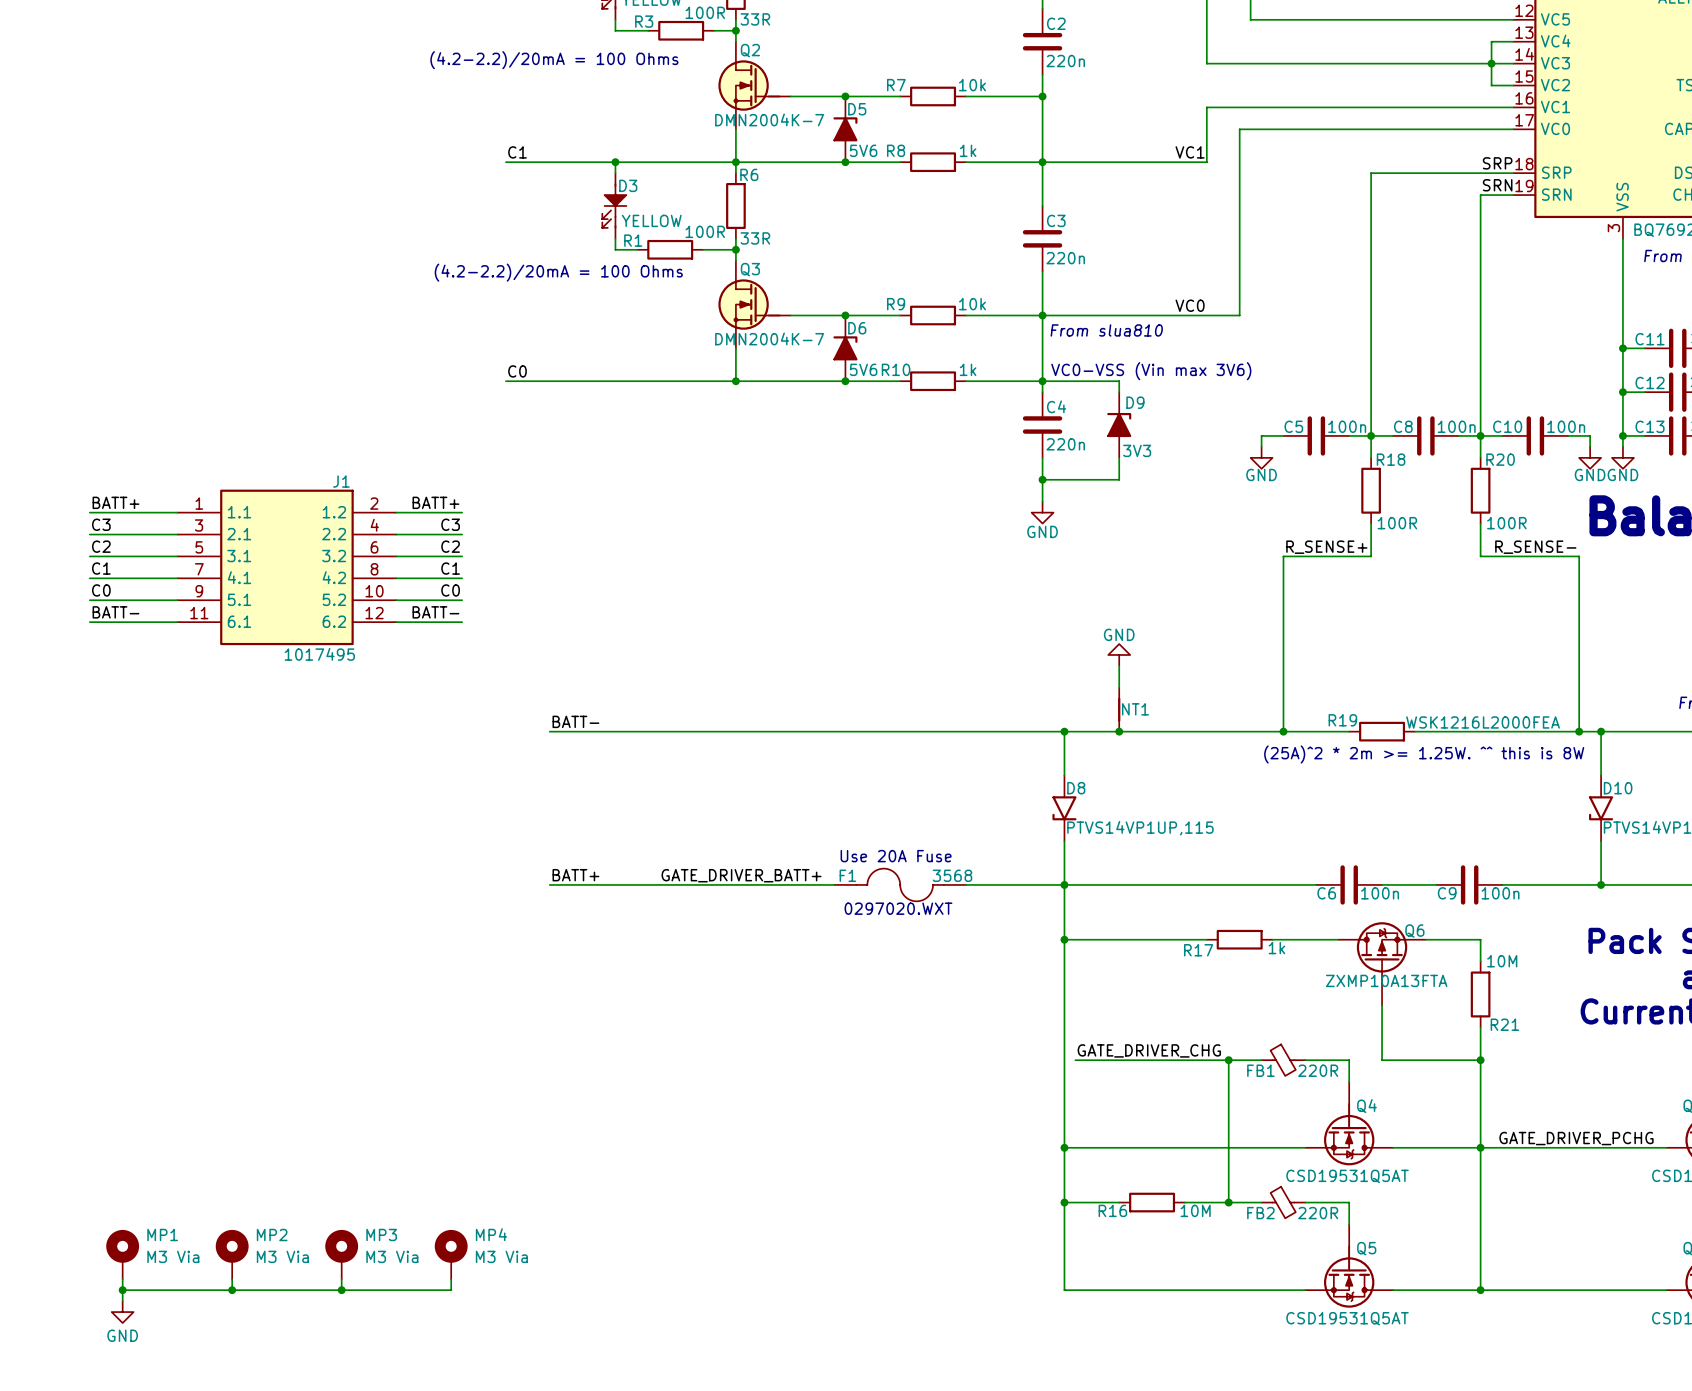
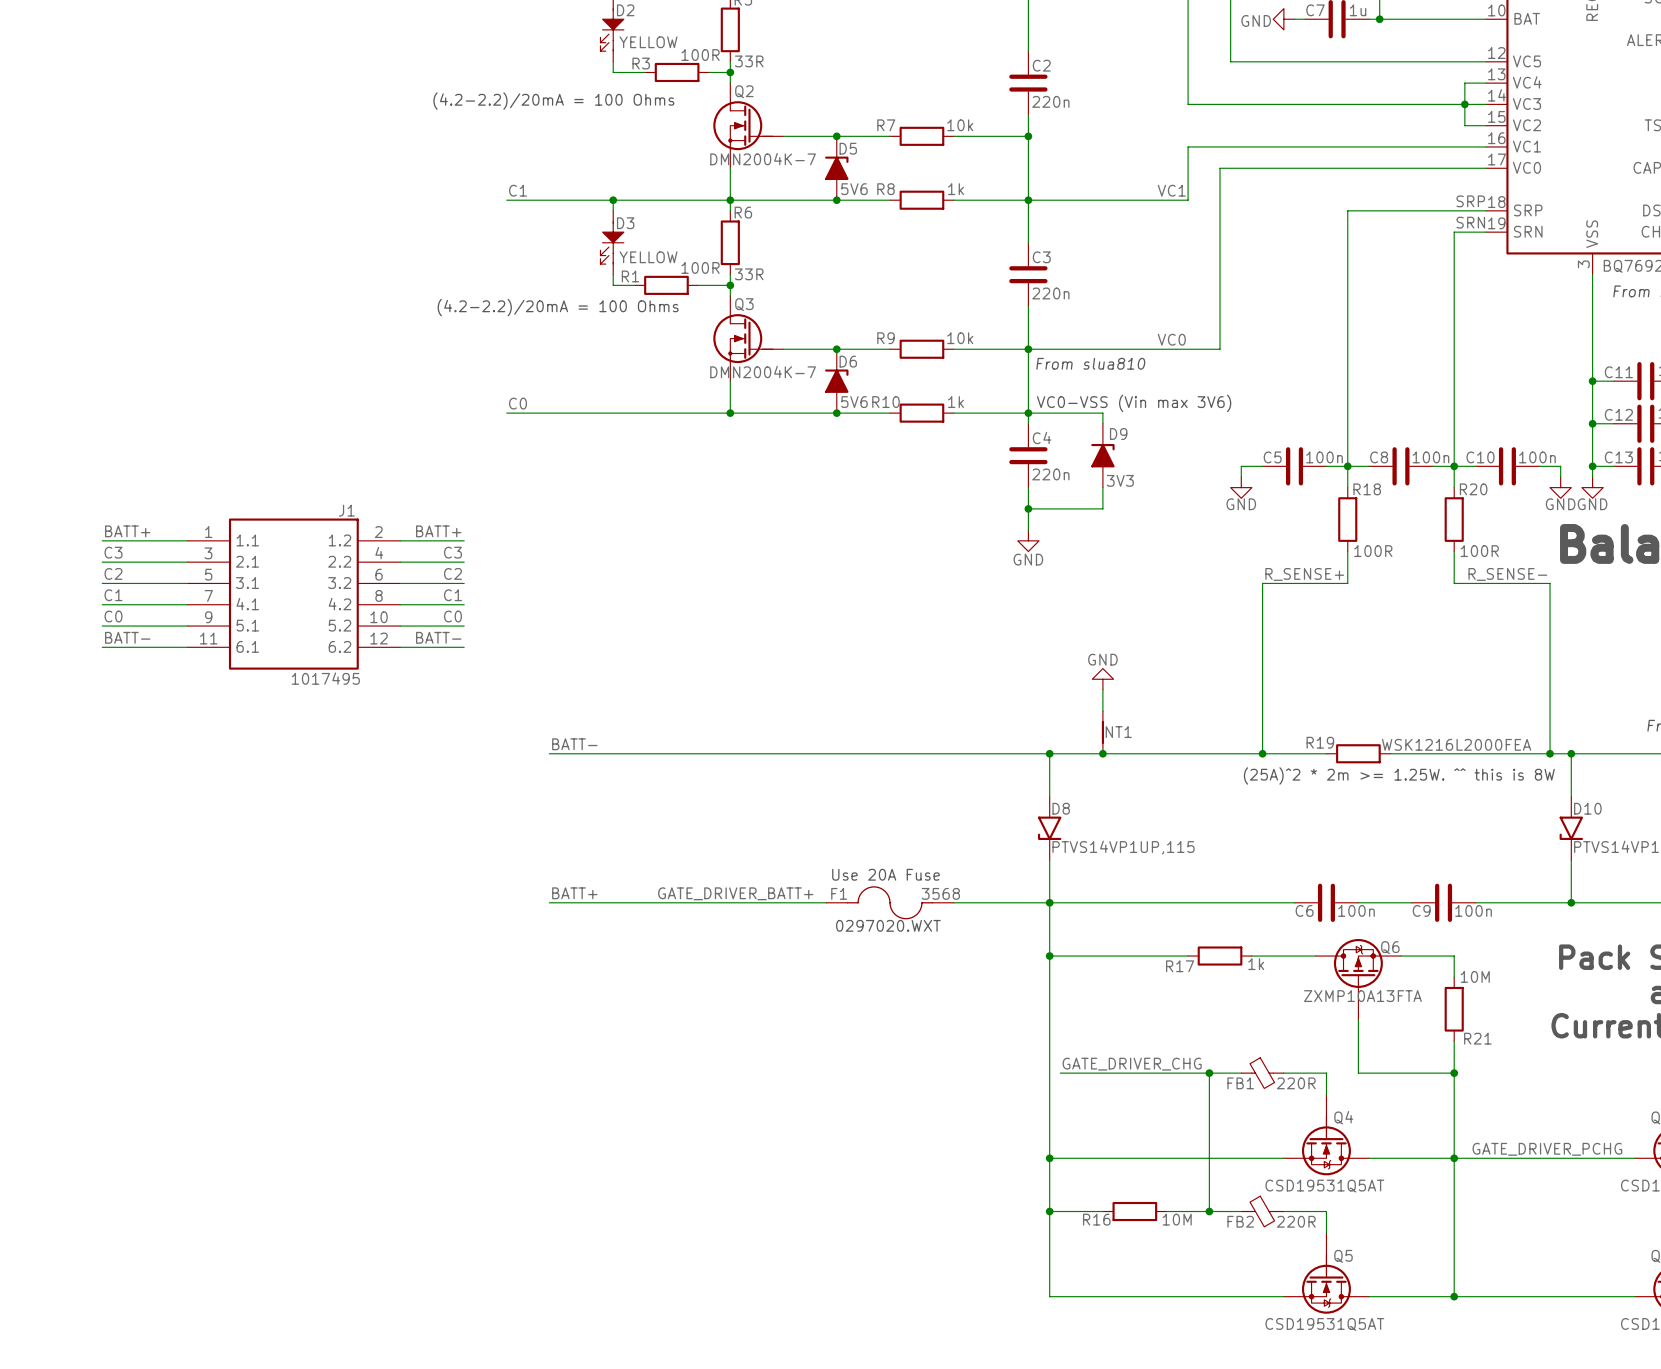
MP1: M3 Via (122, 1254) -> none
MP2: M3 Via (232, 1254) -> none
MP3: M3 Via (341, 1254) -> none
MP4: M3 Via (451, 1254) -> none
wire: (122, 1279) (122, 1301) -> none
wire: (232, 1279) (232, 1290) -> none
wire: (341, 1279) (341, 1290) -> none
wire: (451, 1279) (451, 1290) (122, 1290) -> none
junction: (122, 1290) -> none
junction: (232, 1290) -> none
junction: (341, 1290) -> none
power symbol: GND (122, 1312) -> none

